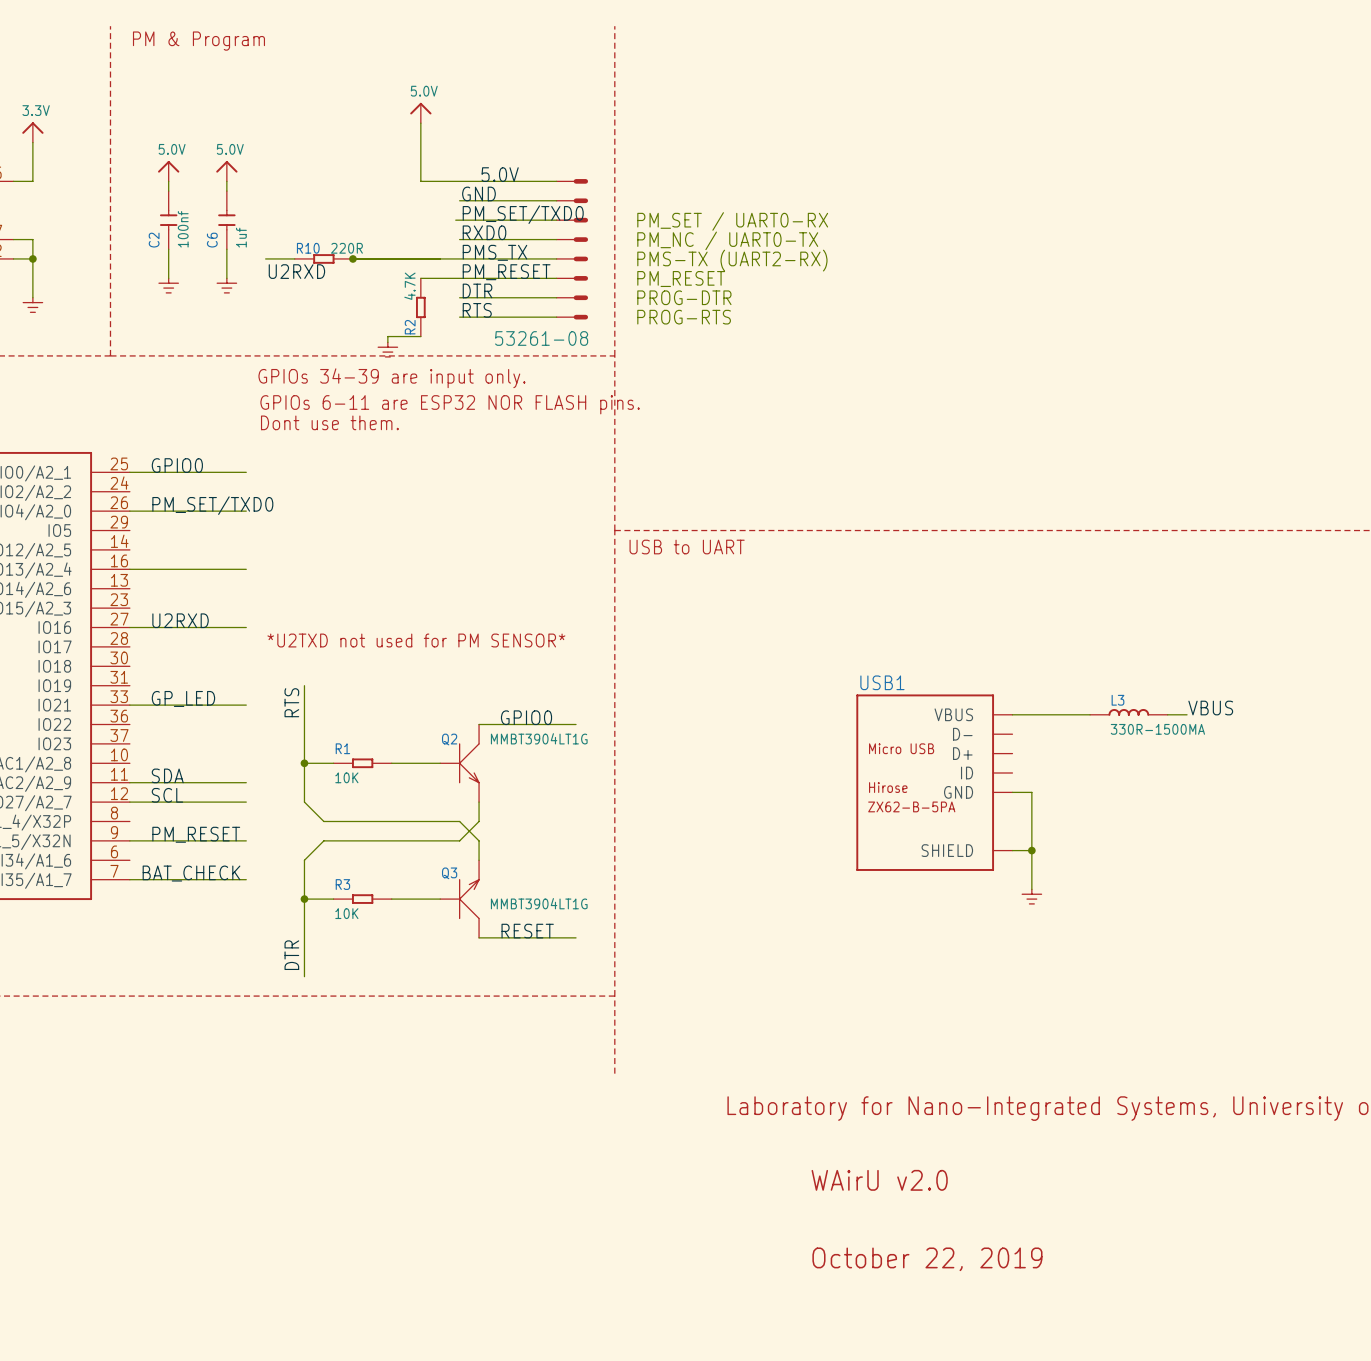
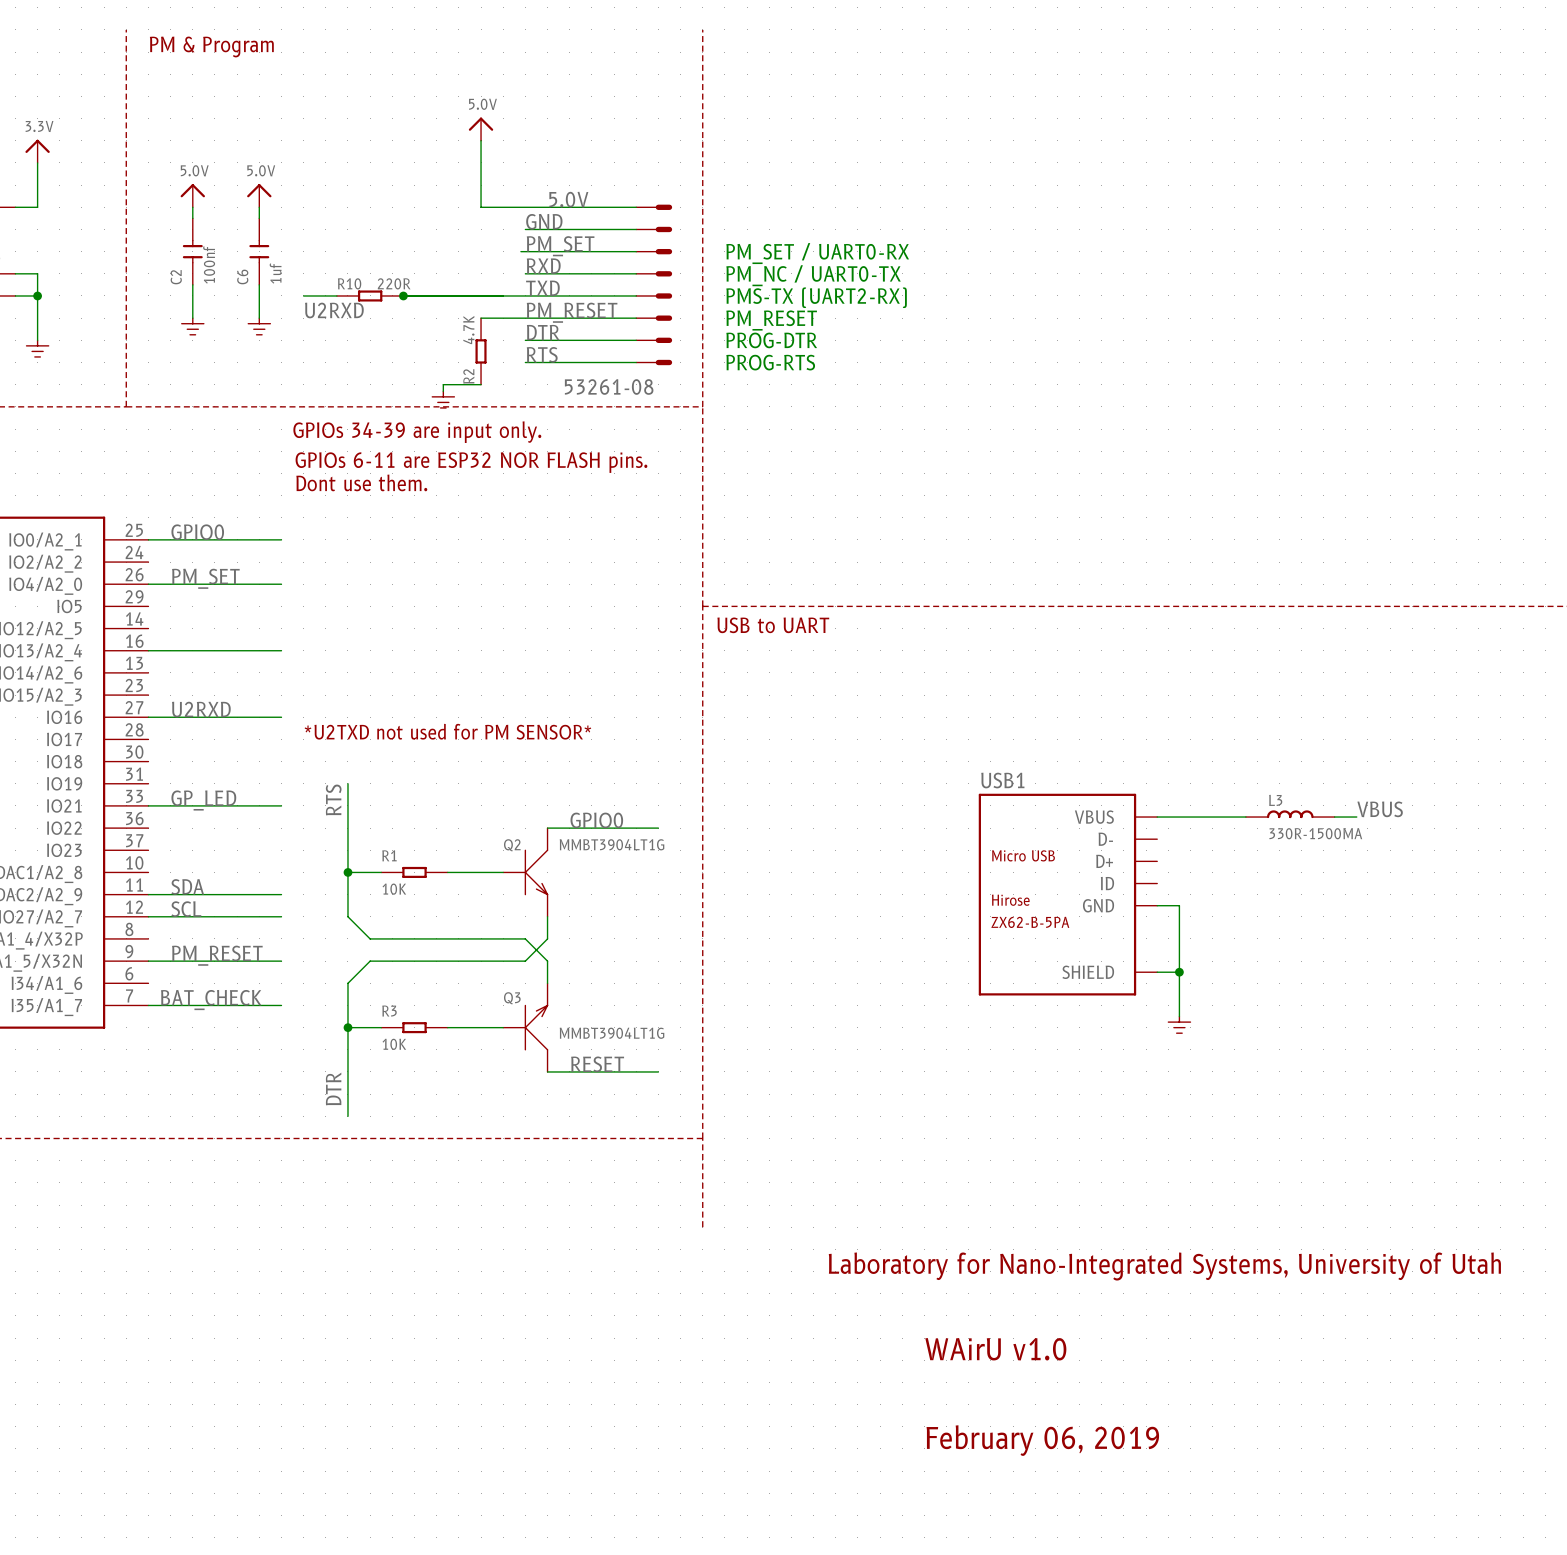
label: PM_SET/TXD0 (523, 214) -> PM_SET (560, 246)
label: RXD0 (484, 232) -> RXD (543, 266)
label: PMS_TX (494, 252) -> TXD (542, 288)
label: PM_SET/TXD0 (212, 505) -> PM_SET (205, 578)
text: WAirU v2.0 (879, 1180) -> WAirU v1.0 (995, 1349)
text: October 22, 2019 (927, 1259) -> February 06, 2019 (1042, 1440)

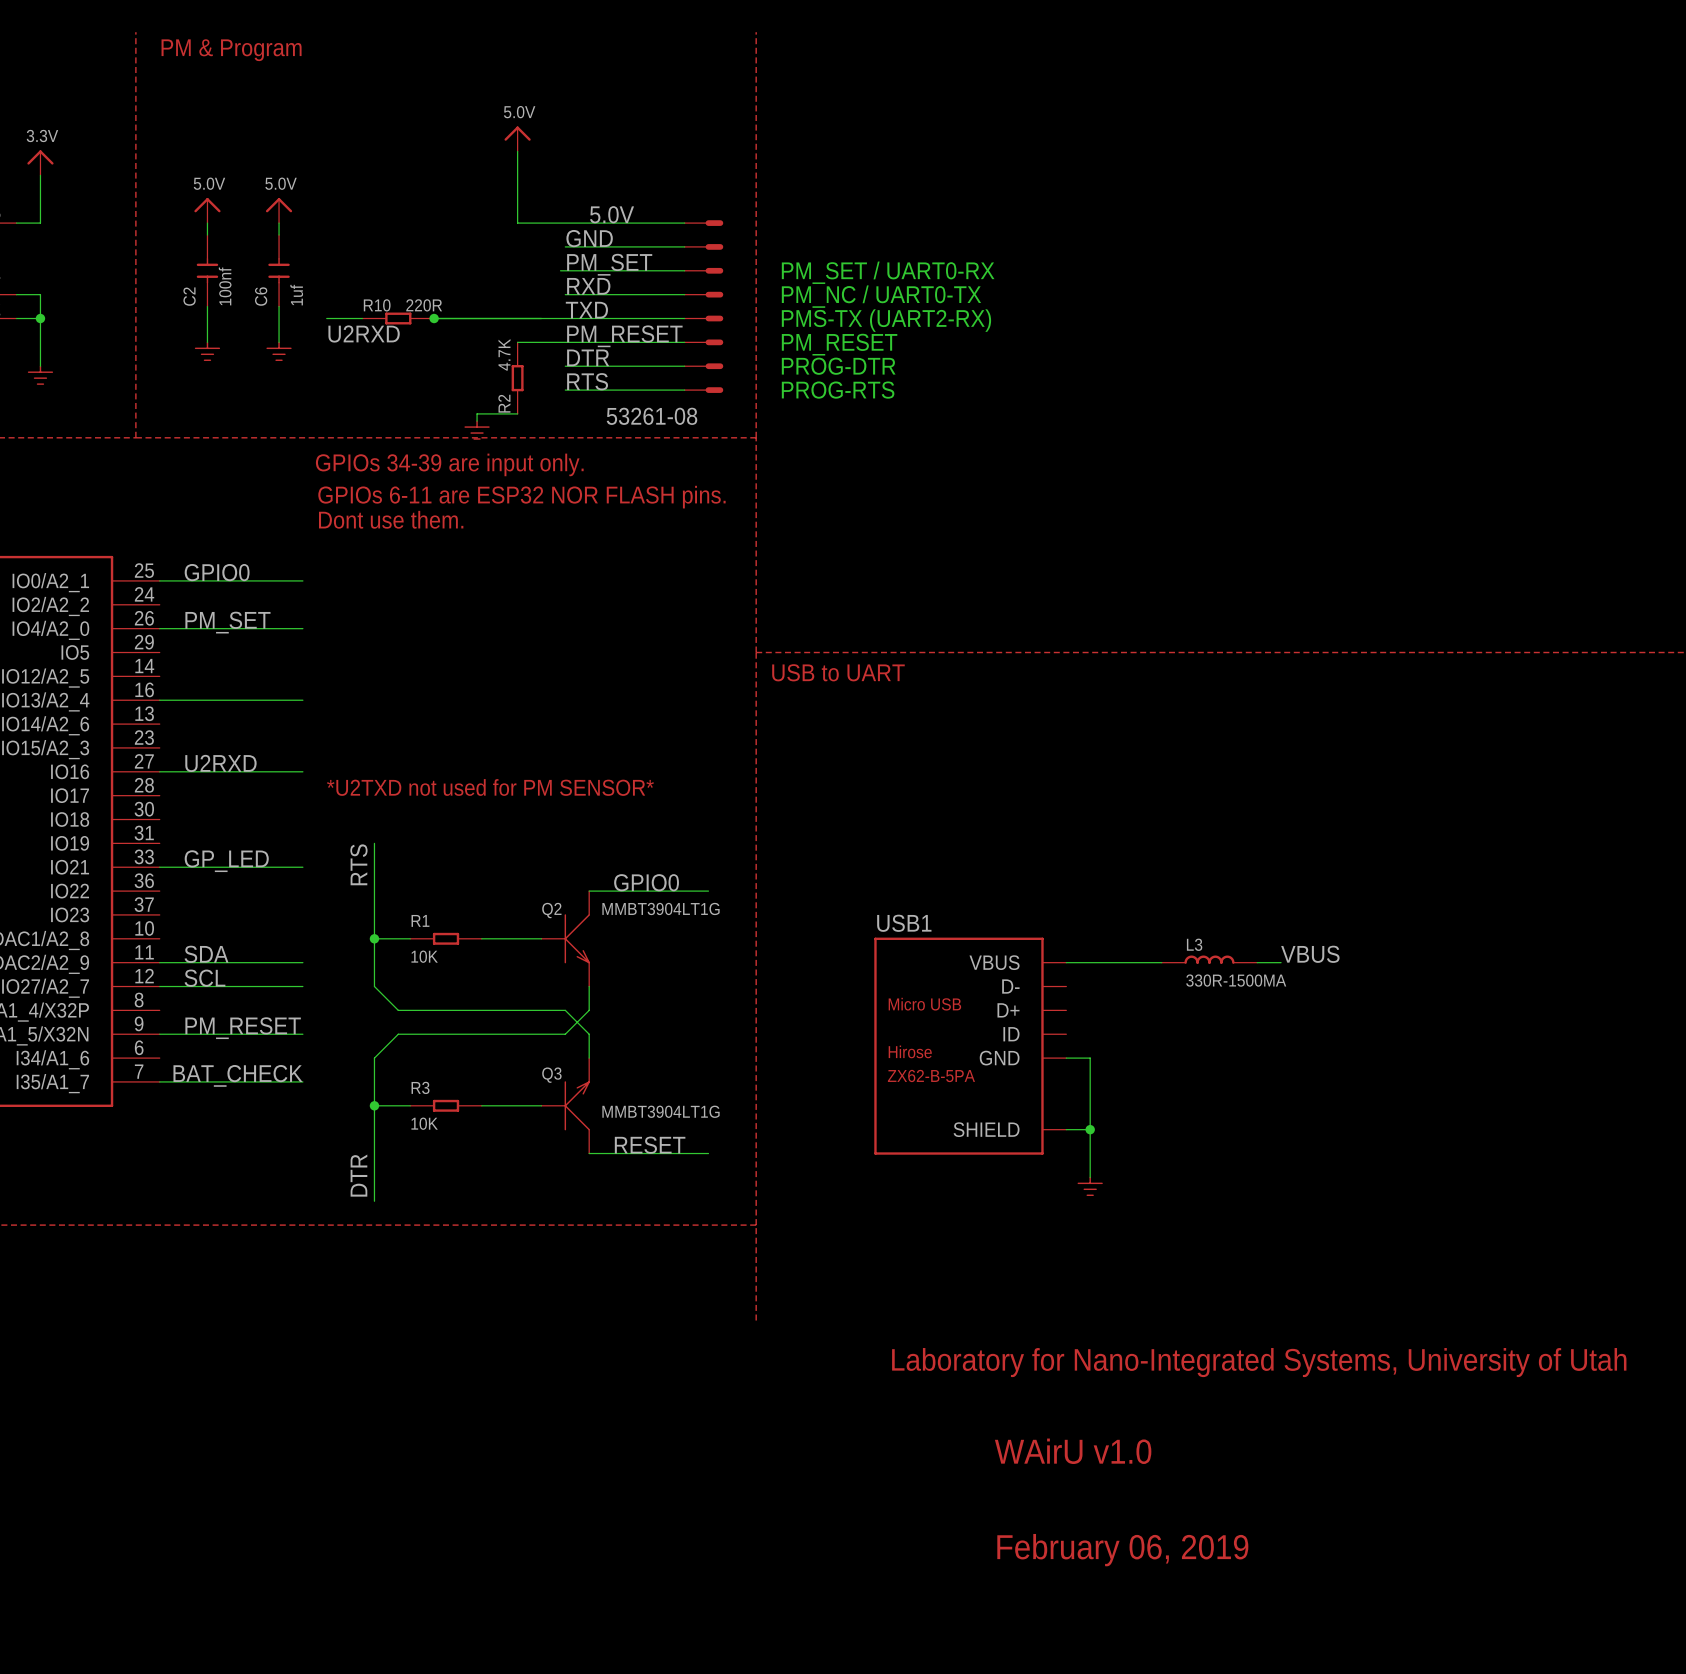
label position: VBUS (1380, 809) -> VBUS (1310, 954)
L3 position: (1290, 814) -> (1209, 959)
wire: (1157, 817) (1245, 817) -> (1066, 962) (1161, 962)
wire: (1334, 817) (1356, 817) -> none
USB1 position: (1068, 894) -> (970, 1046)
wire: (1157, 905) (1179, 905) (1179, 1016) -> (1066, 1058) (1090, 1058) (1090, 1177)
wire: (1157, 972) (1179, 972) -> (1257, 962) (1281, 962)
junction: (1179, 972) -> none
power symbol position: (1179, 1024) -> (1090, 1186)
wire: none -> (1066, 1129) (1090, 1129)
junction: none -> (1090, 1129)

